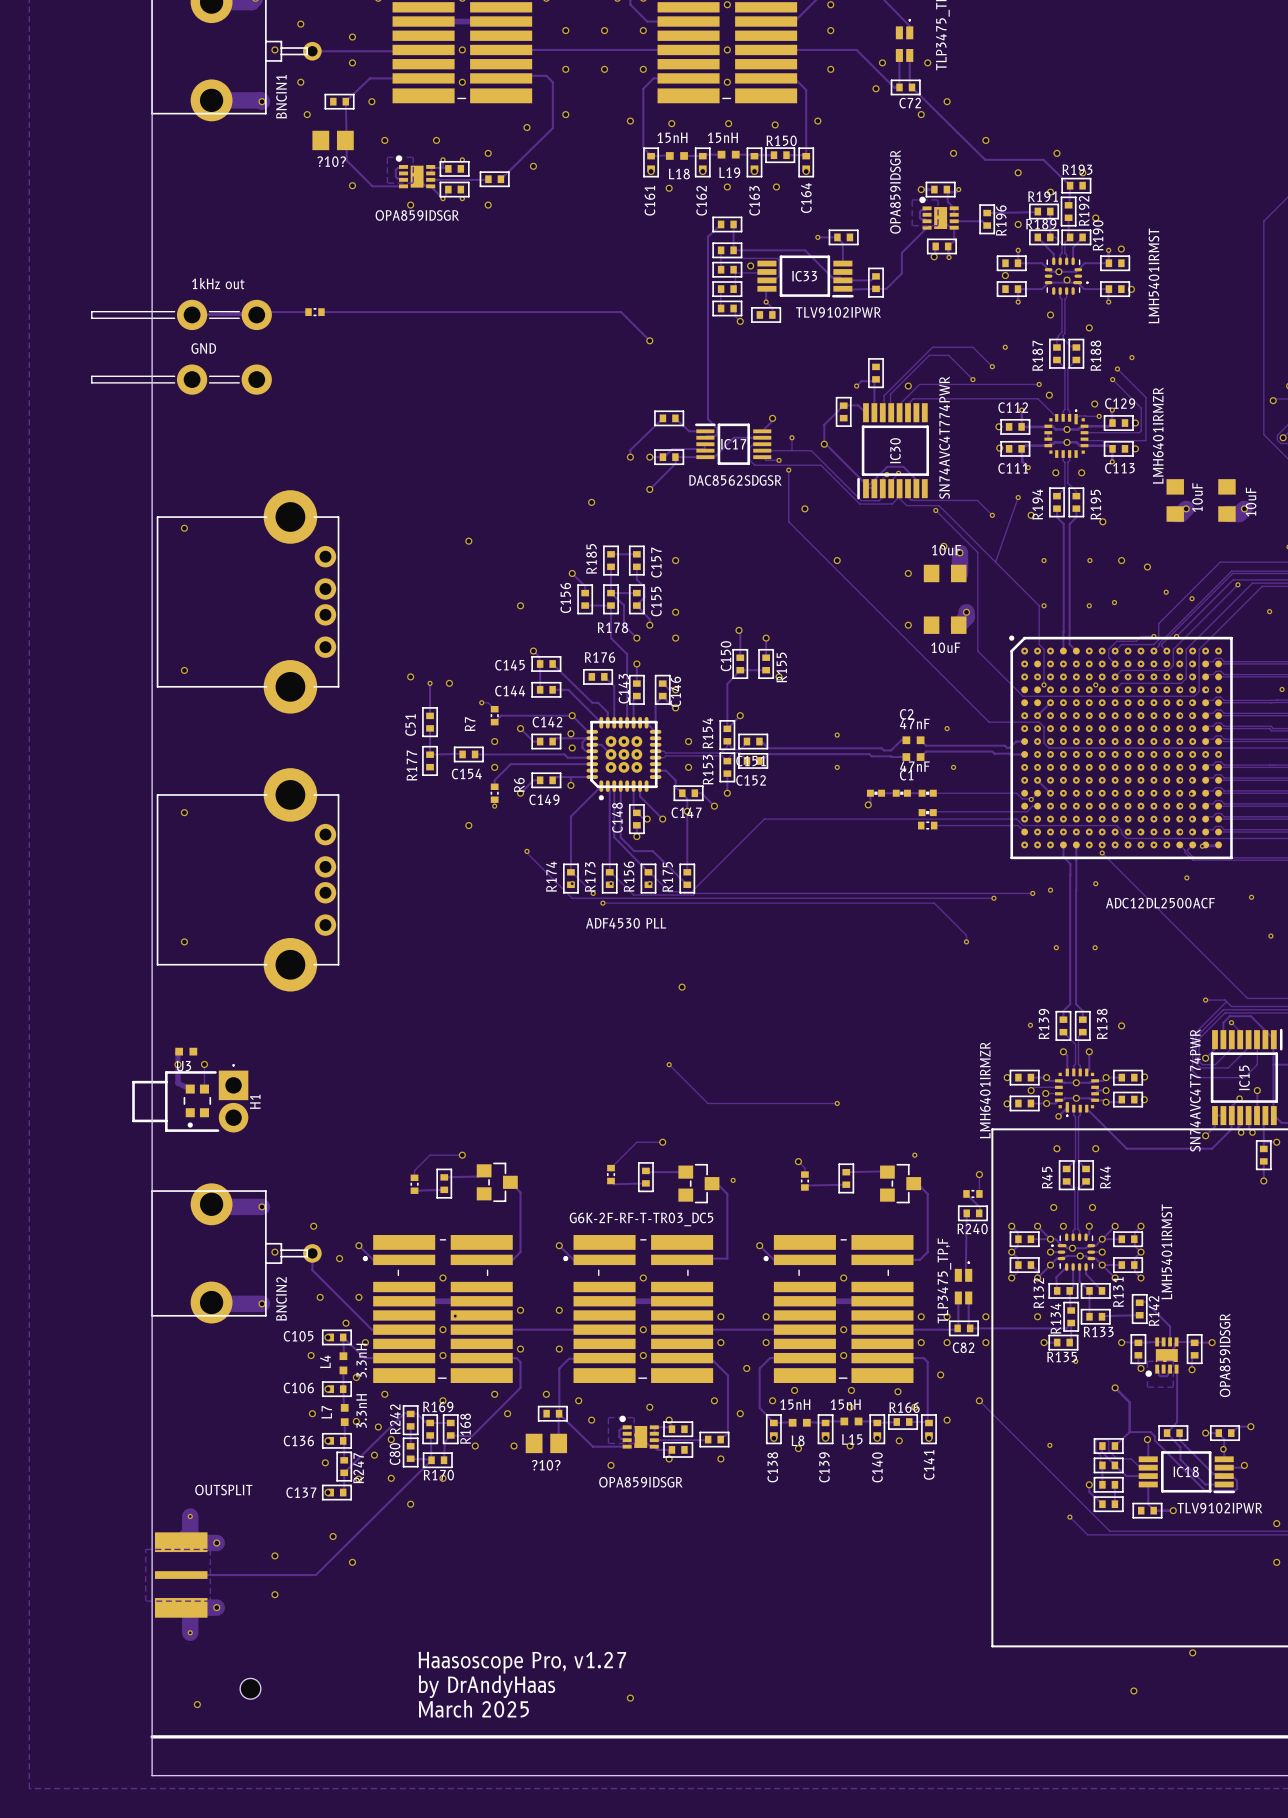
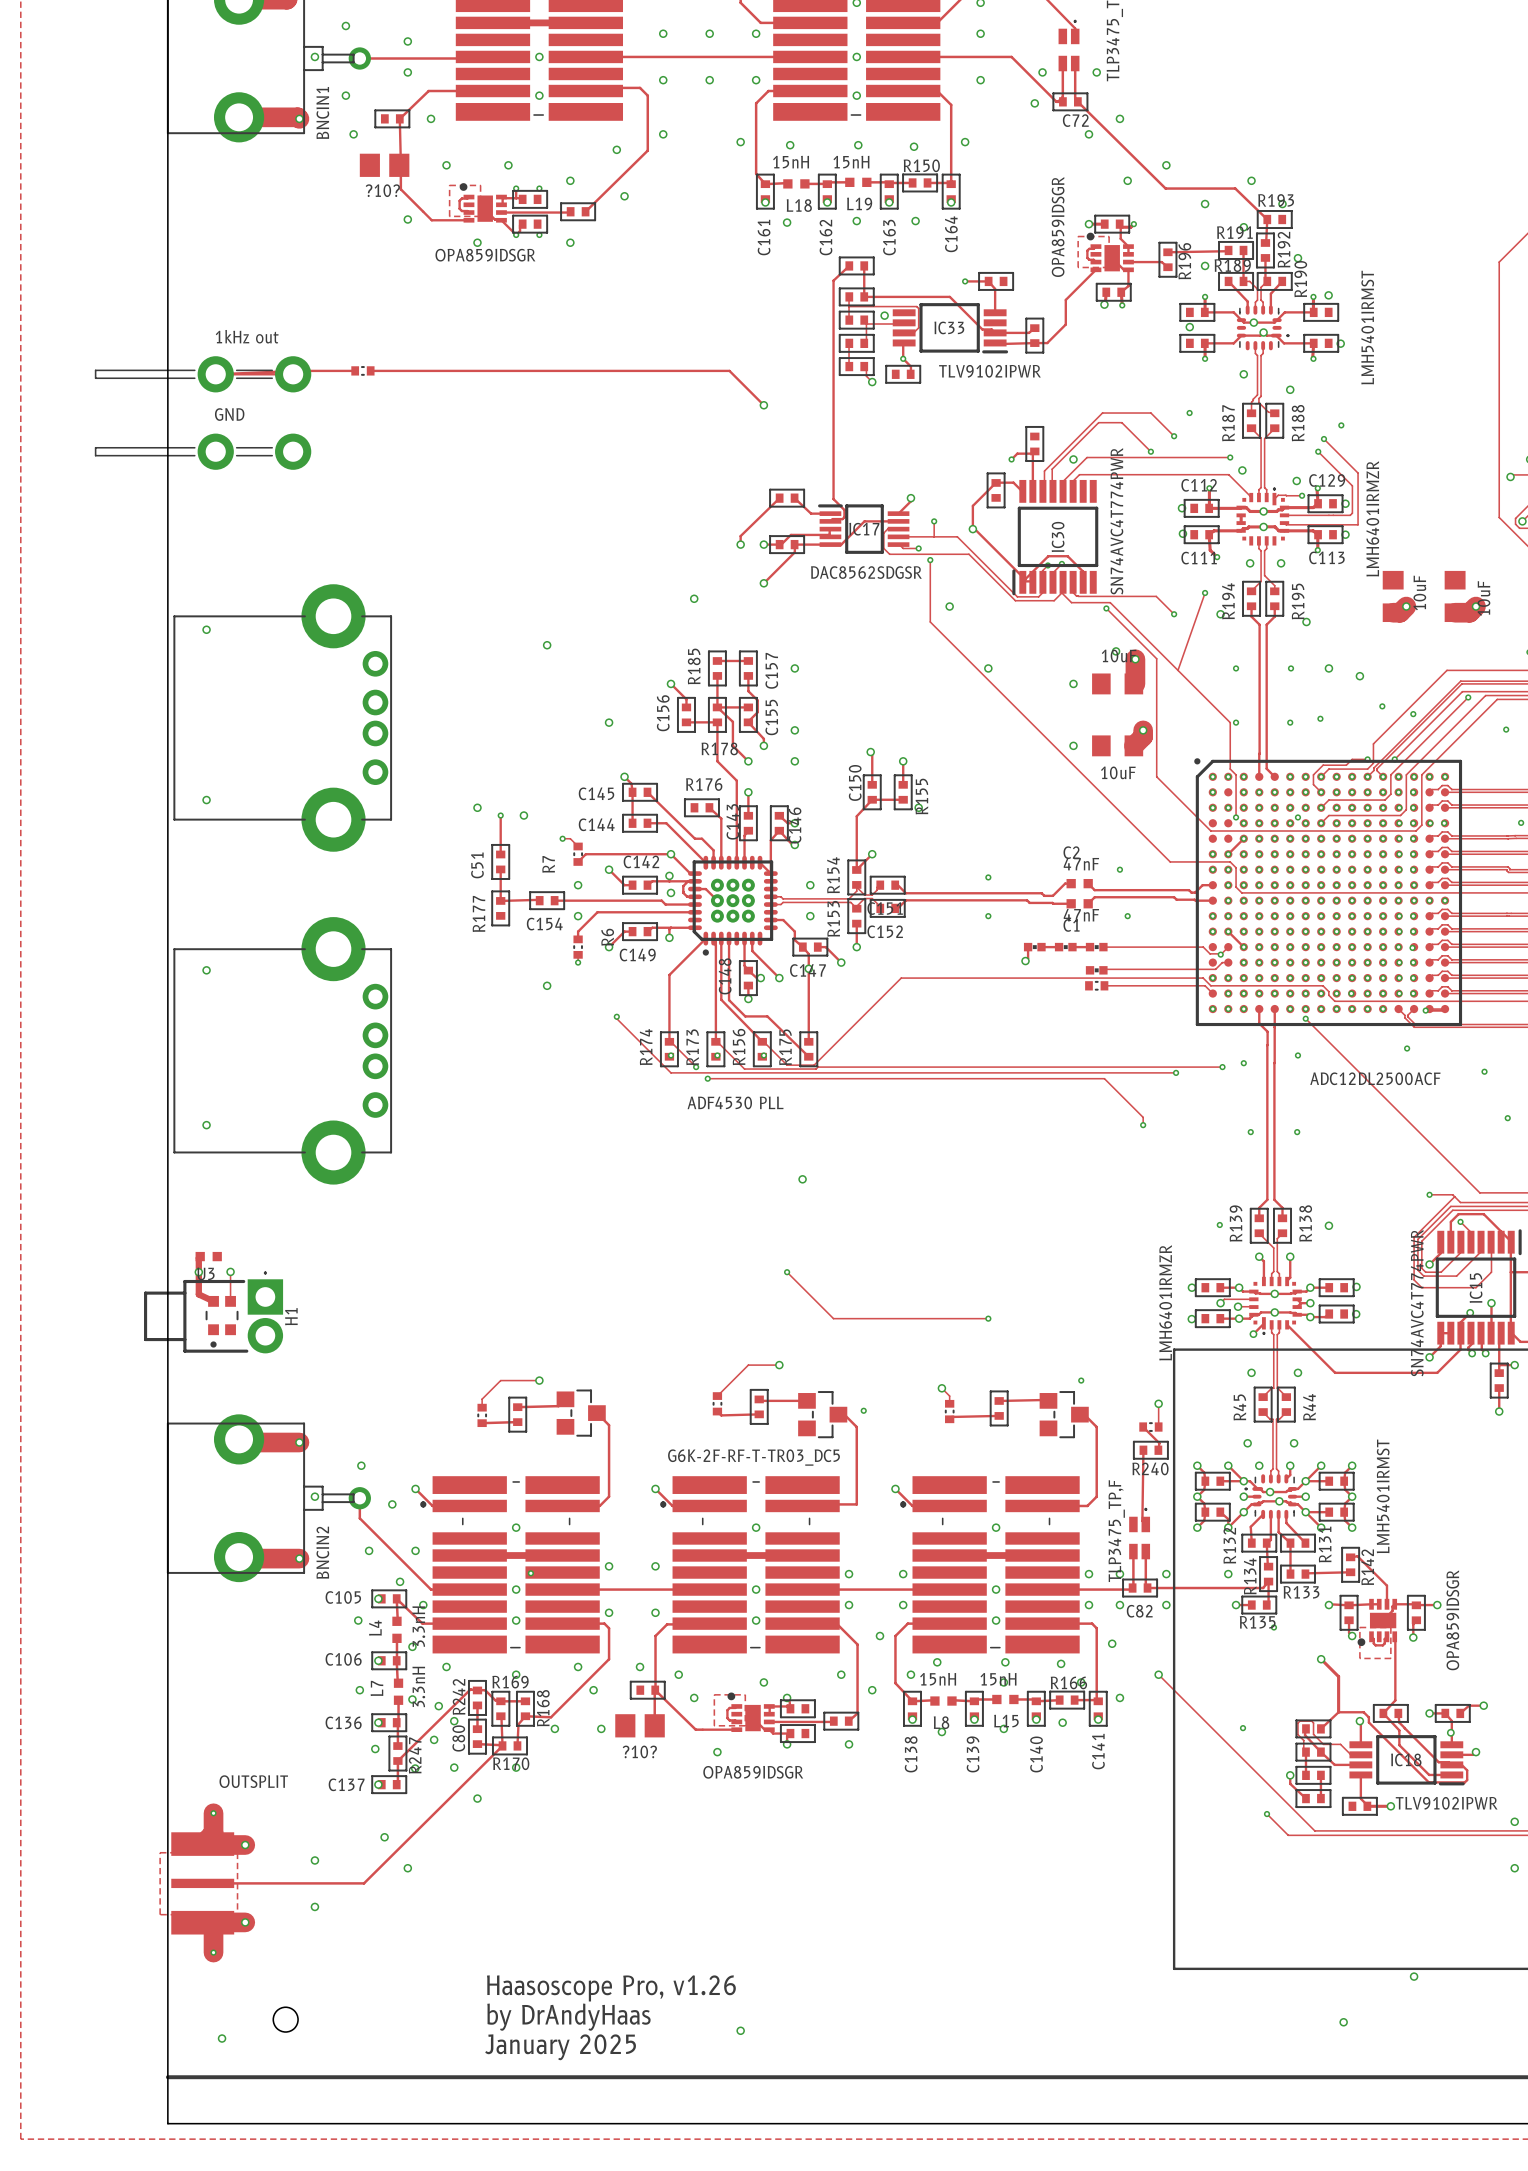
text: Haasoscope Pro, v1.27 (522, 1662) -> Haasoscope Pro, v1.26 (611, 1988)
text: March 2025 (473, 1708) -> January 2025 (560, 2047)

